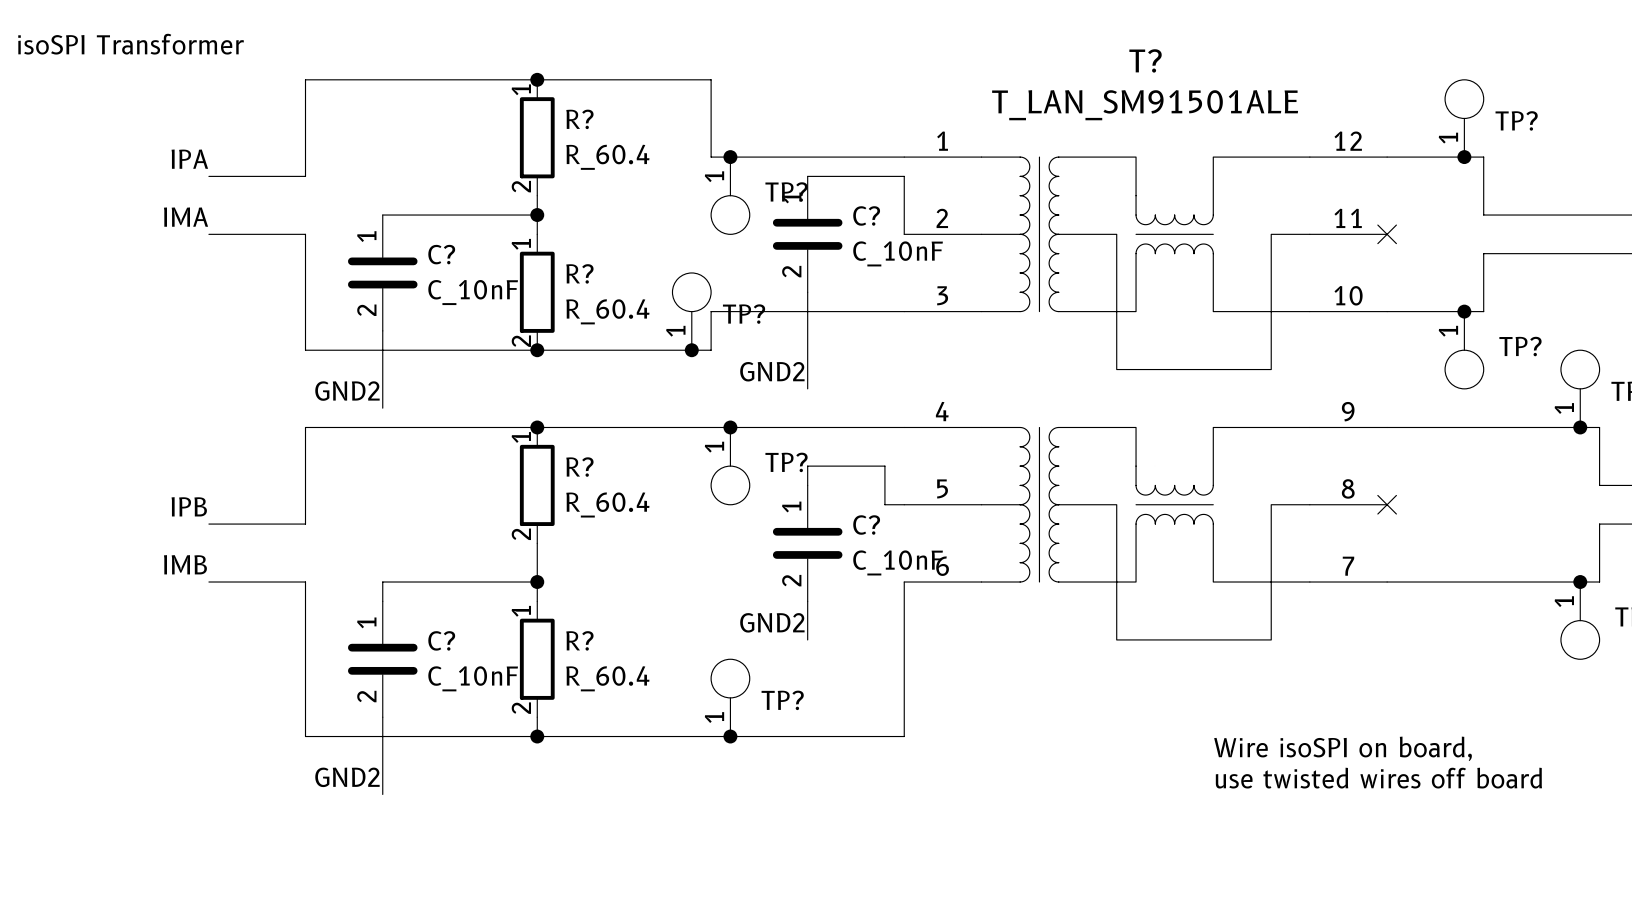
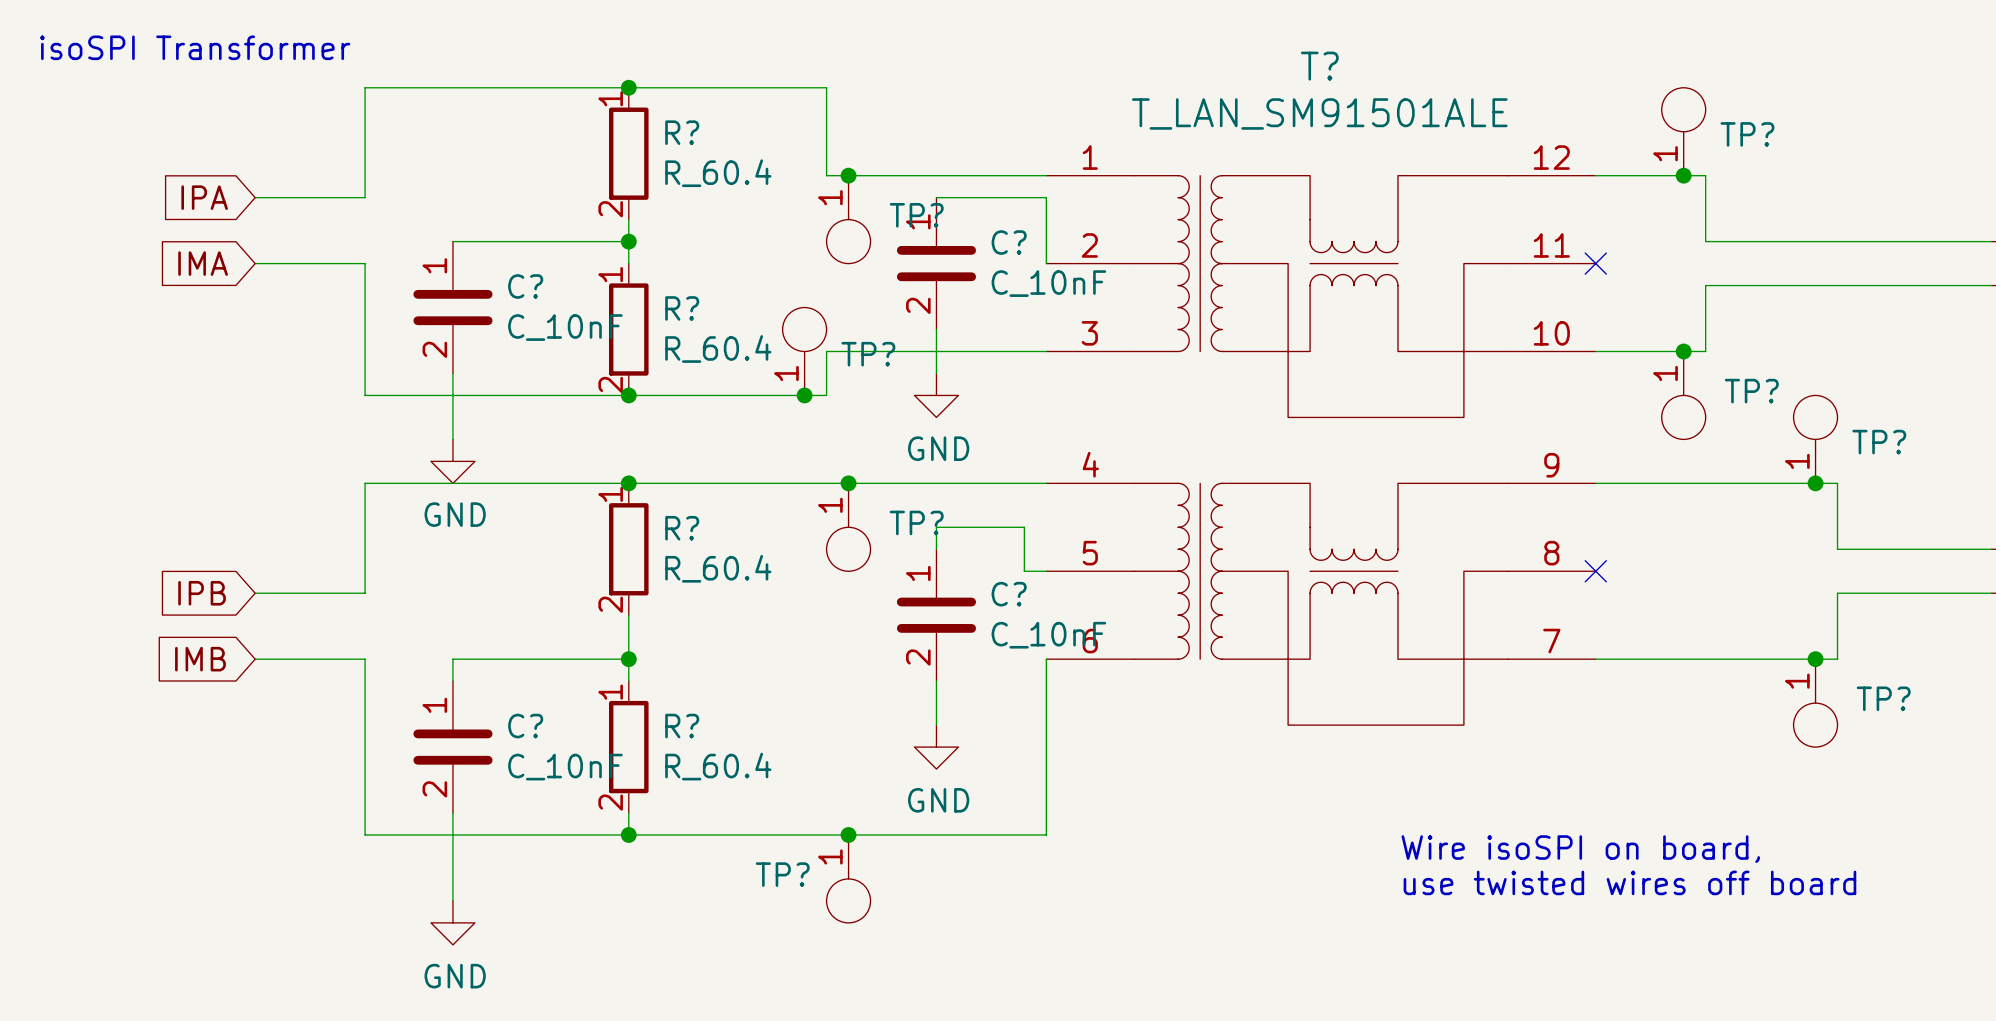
label: IPA (189, 159) -> none
global label: none -> IPA (204, 197)
label: IMA (186, 217) -> none
global label: none -> IMA (203, 263)
wire: (807, 330) (807, 388) -> none
power symbol: none -> GND (936, 395)
label: GND2 (772, 371) -> none
label: GND2 (347, 391) -> none
power symbol: none -> GND (452, 461)
label: IPB (189, 506) -> none
global label: none -> IPB (202, 593)
label: IMB (185, 564) -> none
global label: none -> IMB (200, 659)
label: GND2 (772, 622) -> none
power symbol: none -> GND (936, 747)
TP? rotation: 0° (730, 678) -> 180° (848, 900)
TP? position: (730, 697) -> (848, 878)
label: GND2 (347, 777) -> none
power symbol: none -> GND (452, 922)

